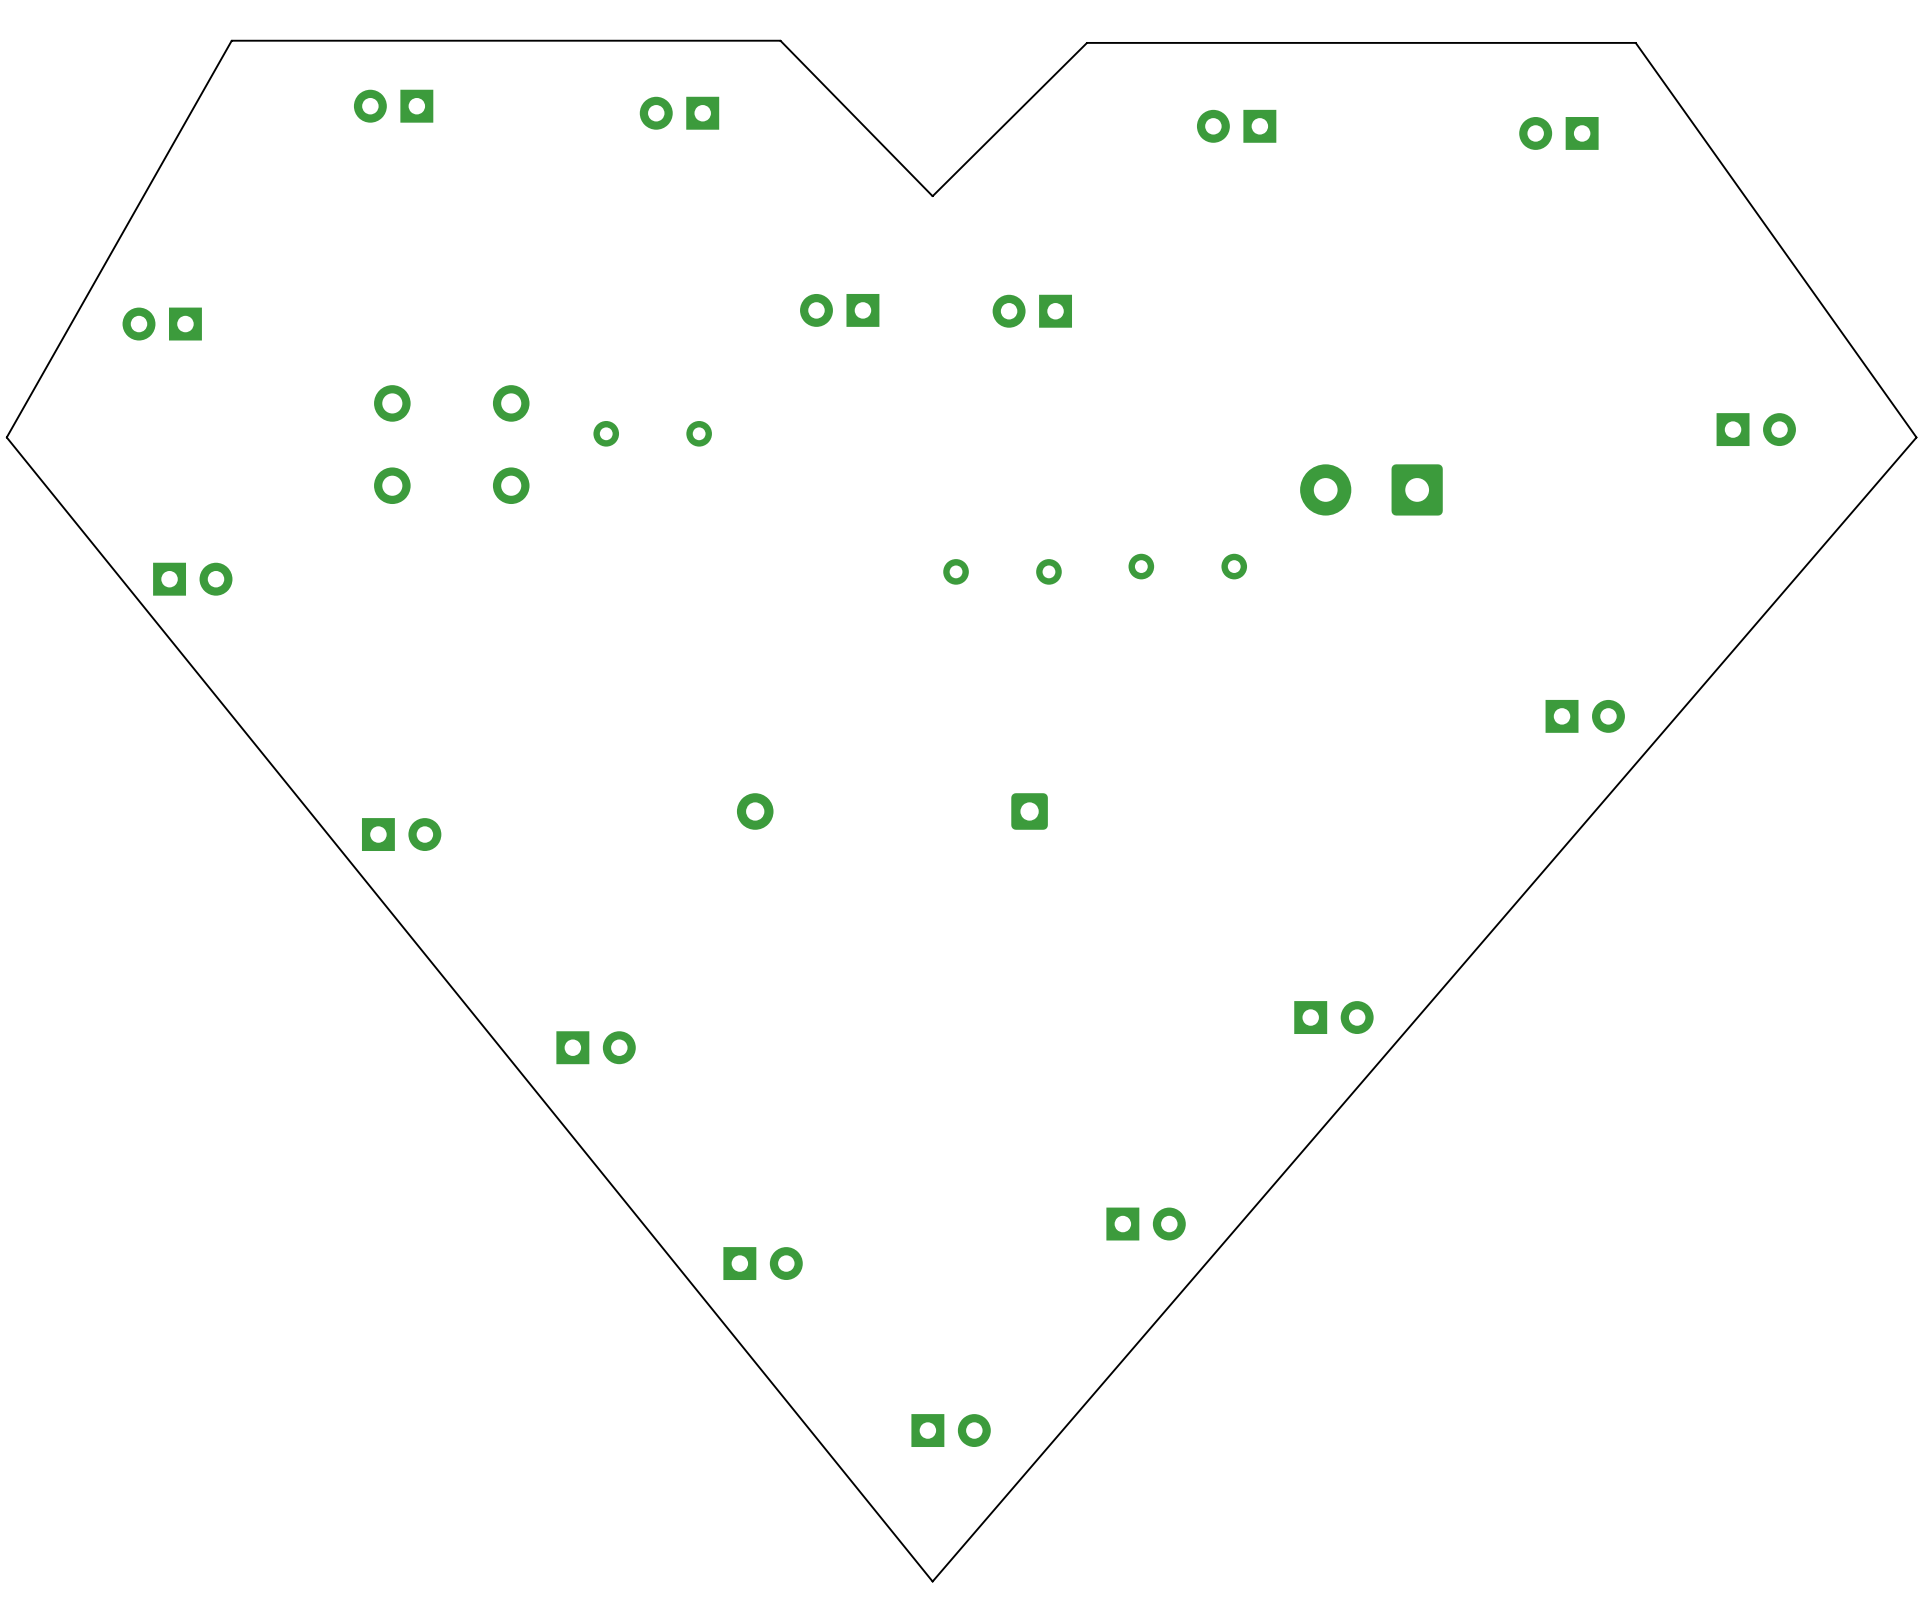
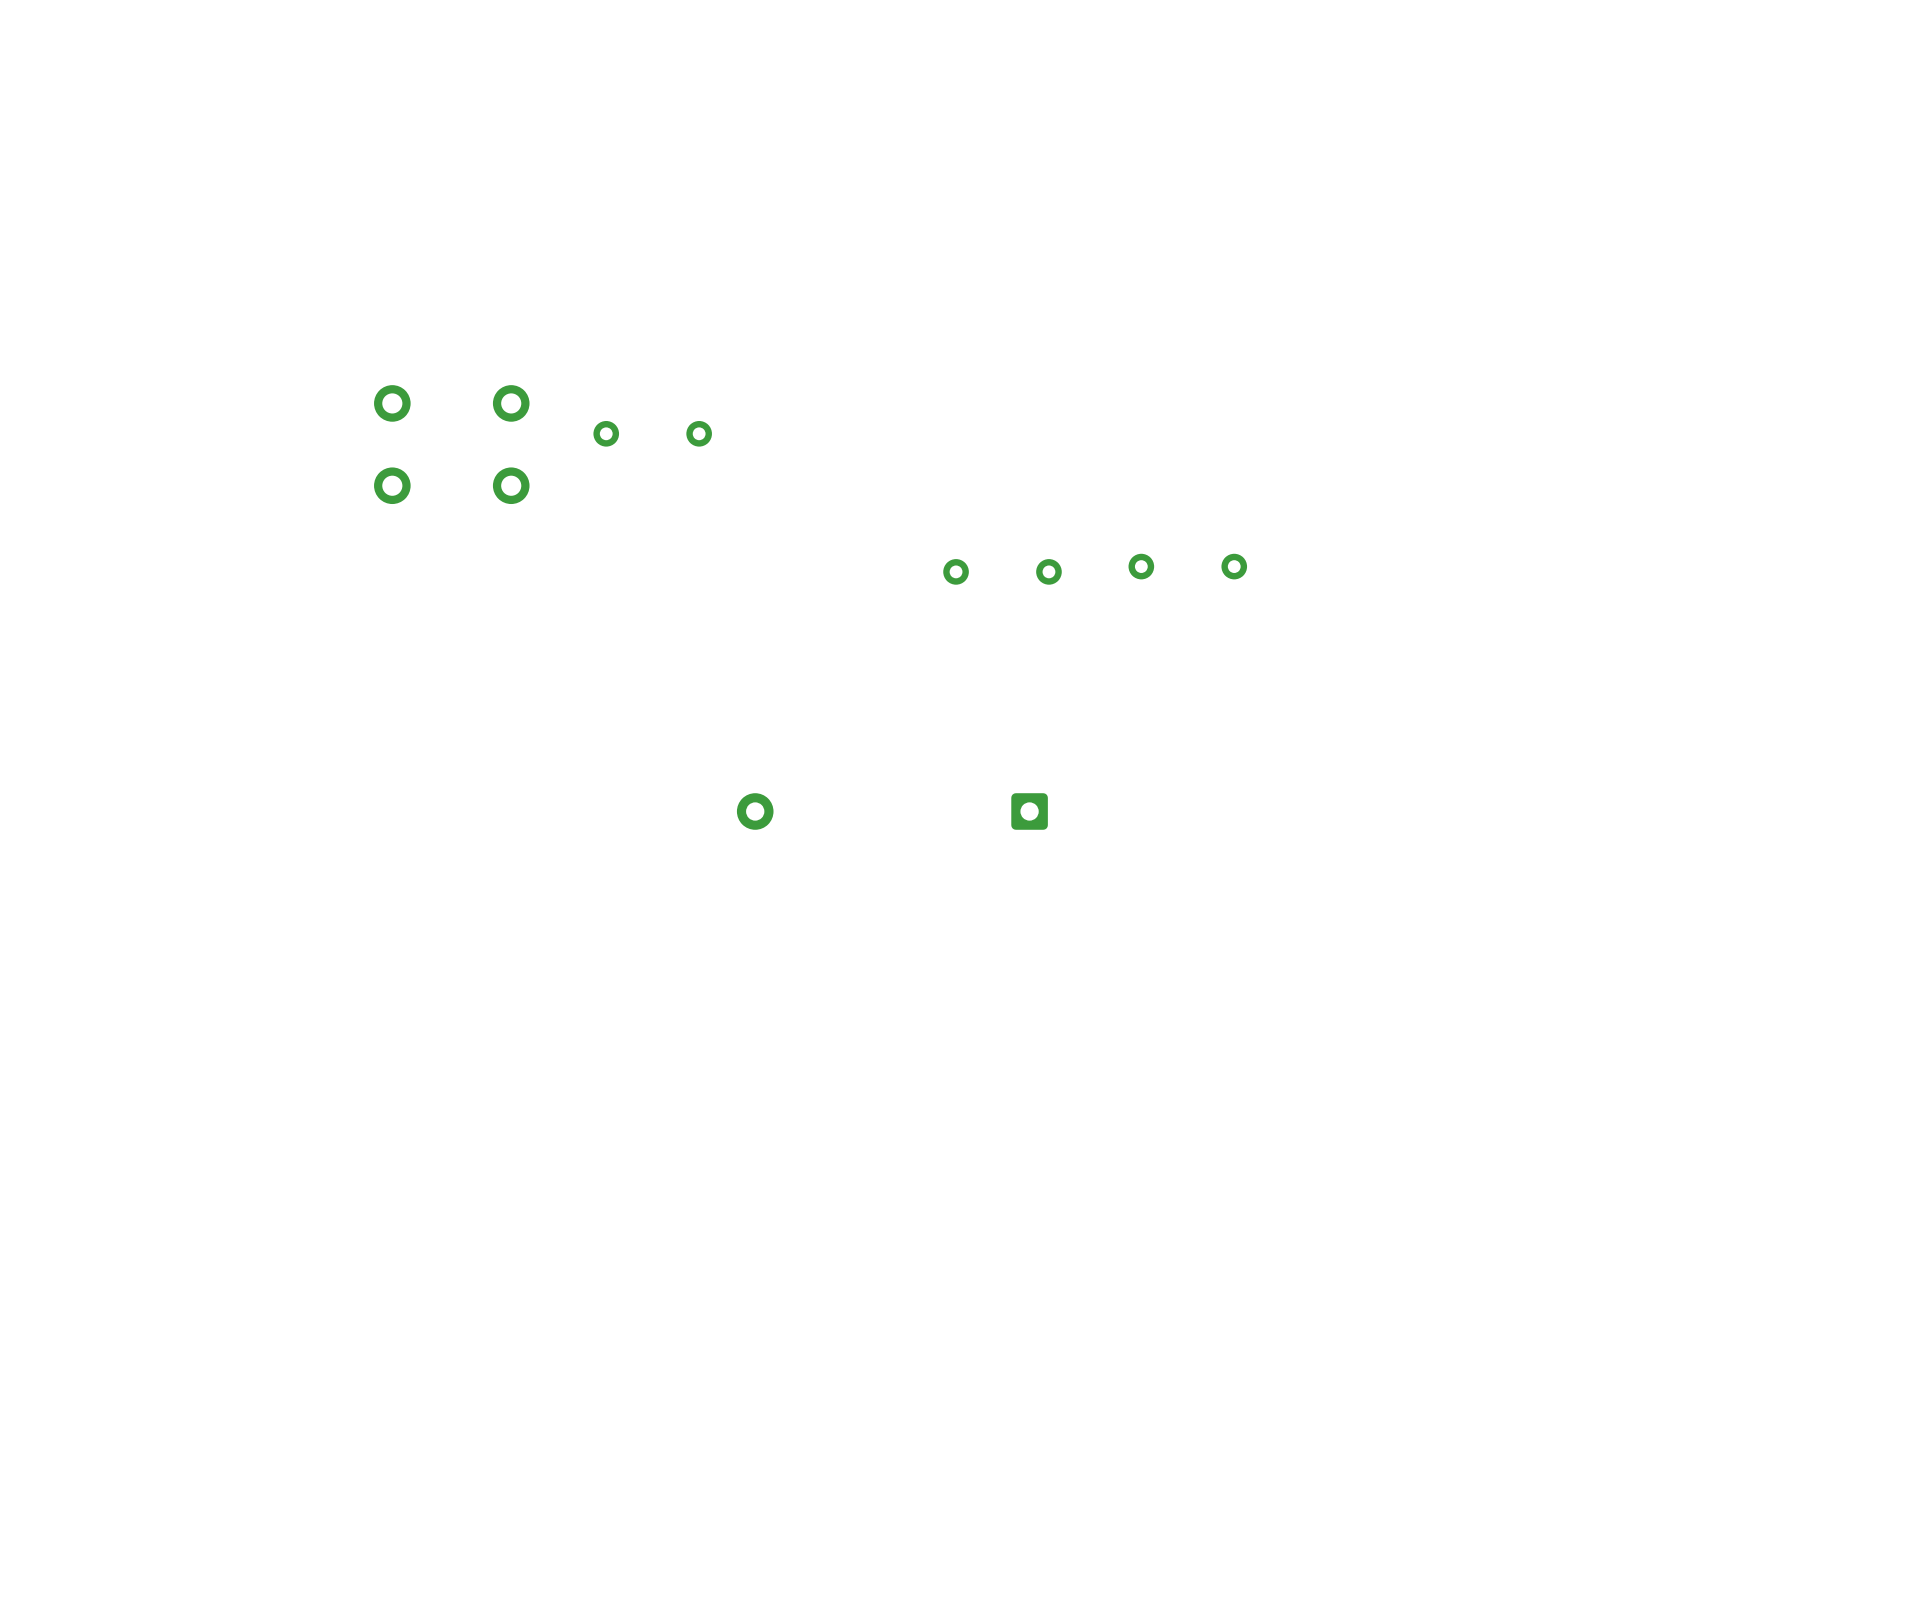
board edge: (780, 40) (231, 40) (6, 437) (932, 1581) (1916, 437) (1635, 42) (1087, 42) (932, 196) (780, 40) -> none
part: (393, 106) -> none
part: (679, 113) -> none
part: (1236, 126) -> none
part: (1558, 133) -> none
part: (839, 310) -> none
part: (1032, 311) -> none
part: (162, 324) -> none
part: (1756, 429) -> none
part: (1371, 489) -> none
part: (192, 579) -> none
part: (1585, 716) -> none
part: (401, 834) -> none
part: (1333, 1017) -> none
part: (596, 1047) -> none
part: (1146, 1224) -> none
part: (763, 1263) -> none
part: (951, 1430) -> none

